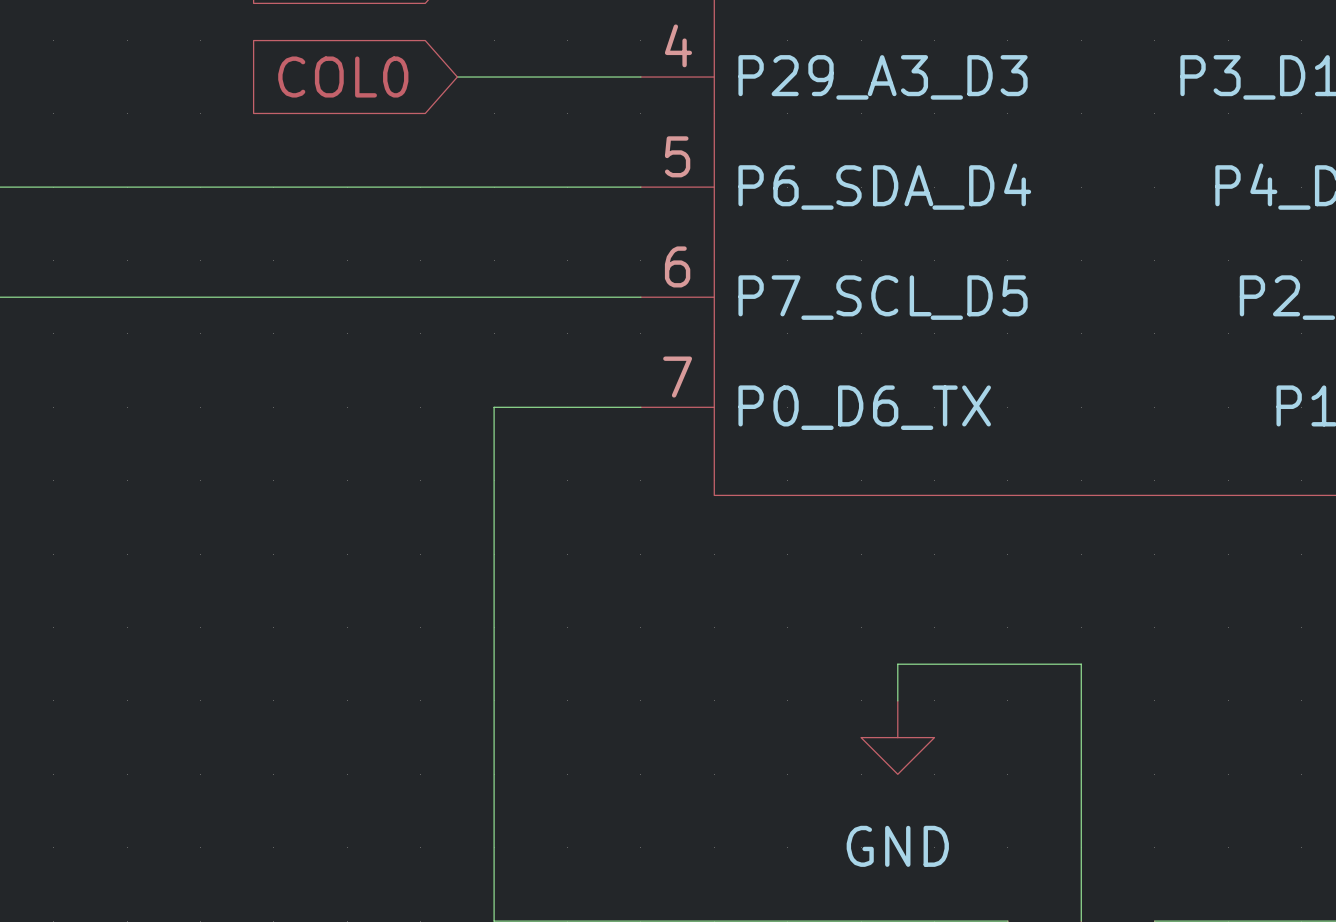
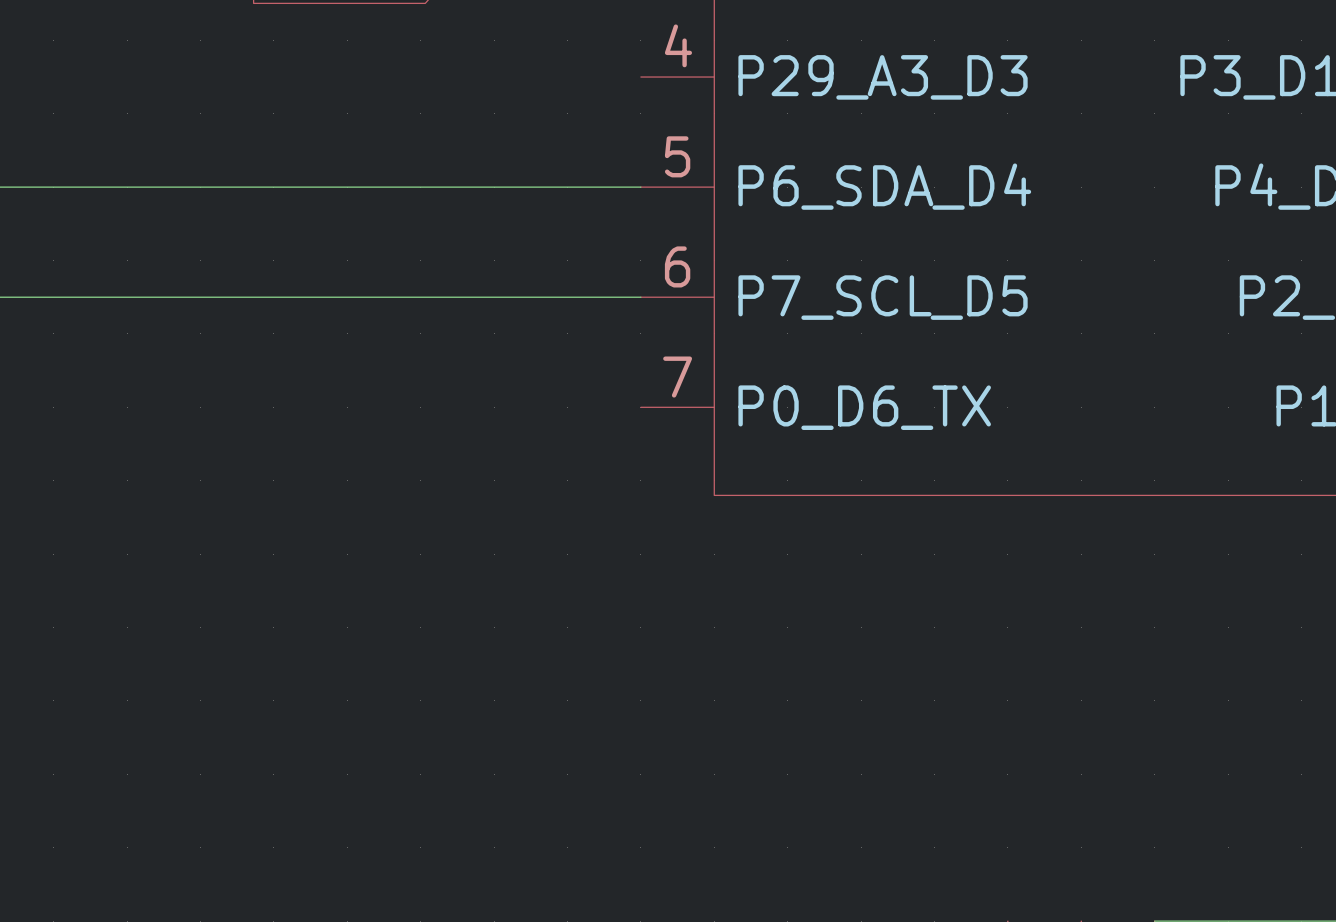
global label: COL0 (343, 77) -> none
wire: (457, 77) (640, 77) -> none
wire: (640, 407) (494, 407) (494, 921) (1007, 921) -> none
wire: (897, 700) (897, 664) (1081, 664) (1081, 921) -> none
power symbol: GND (897, 737) -> none

